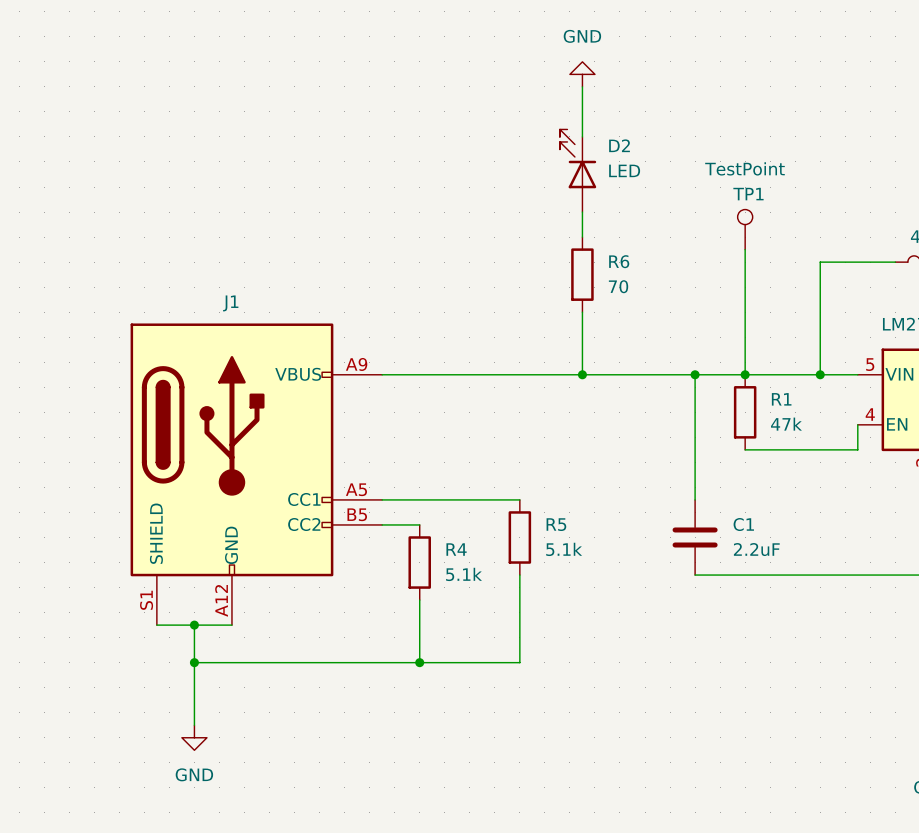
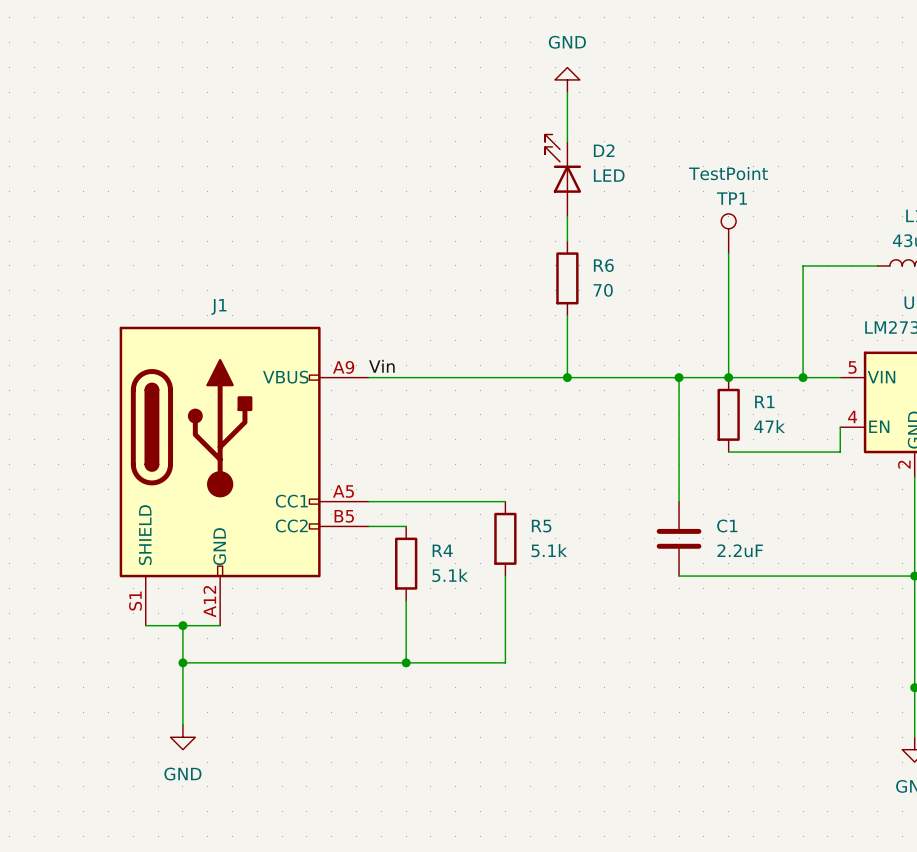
label: none -> Vin (381, 366)

